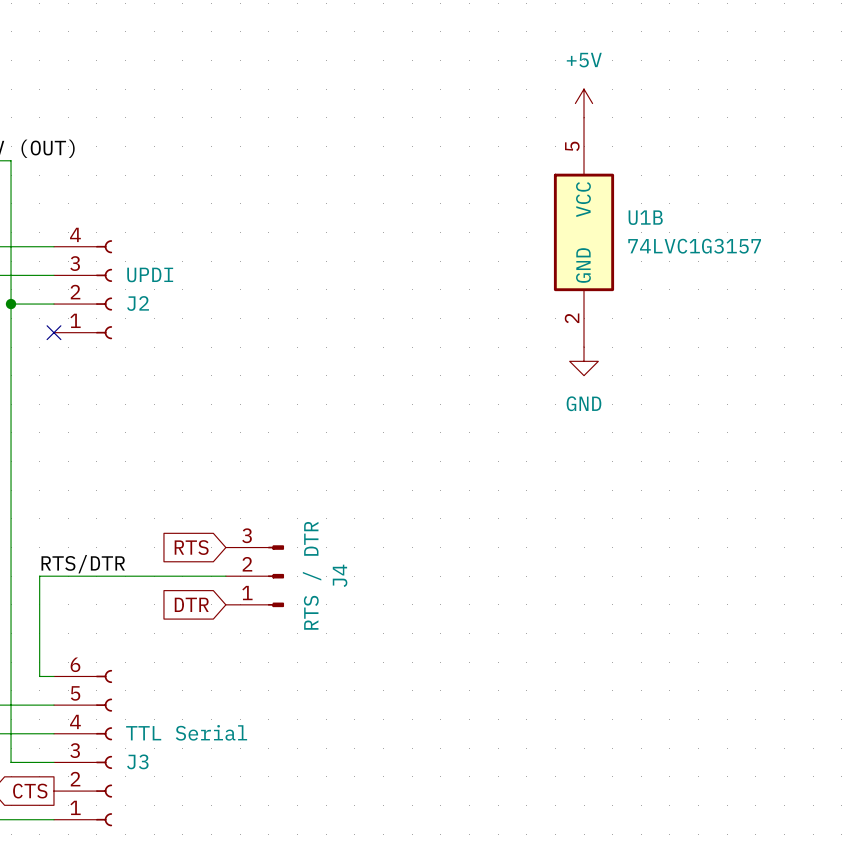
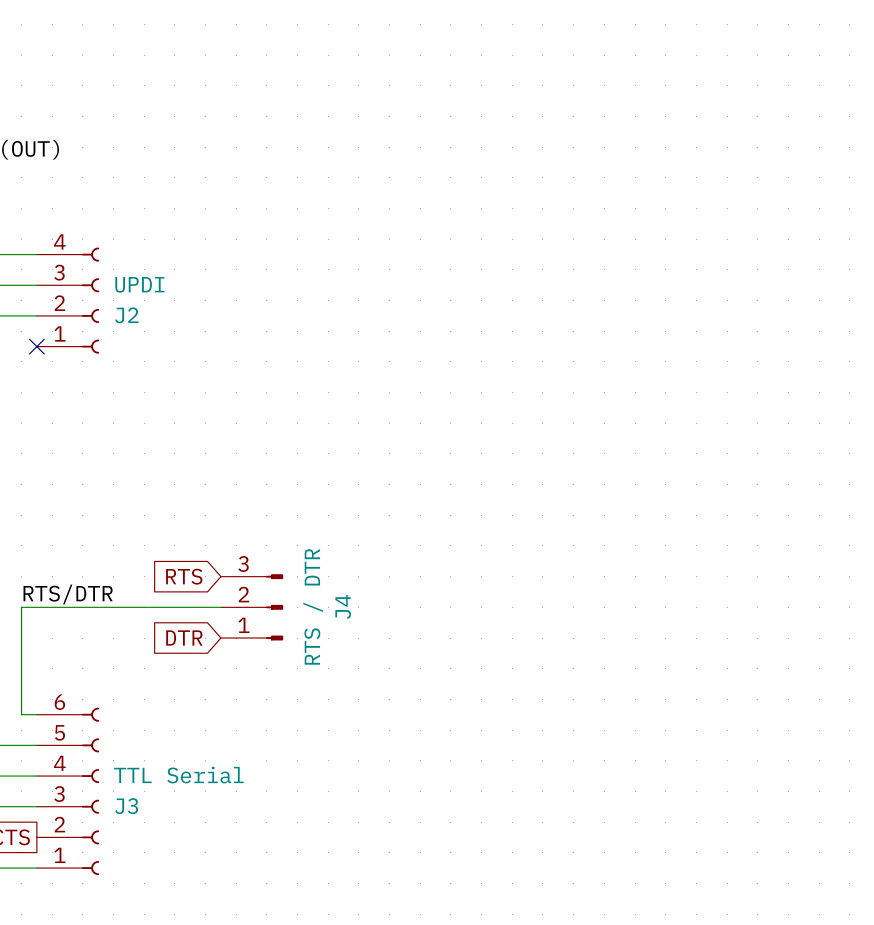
power symbol: +5V (584, 103) -> none
U1B: 74LVC1G3157 (584, 232) -> none
power symbol: GND (584, 361) -> none

